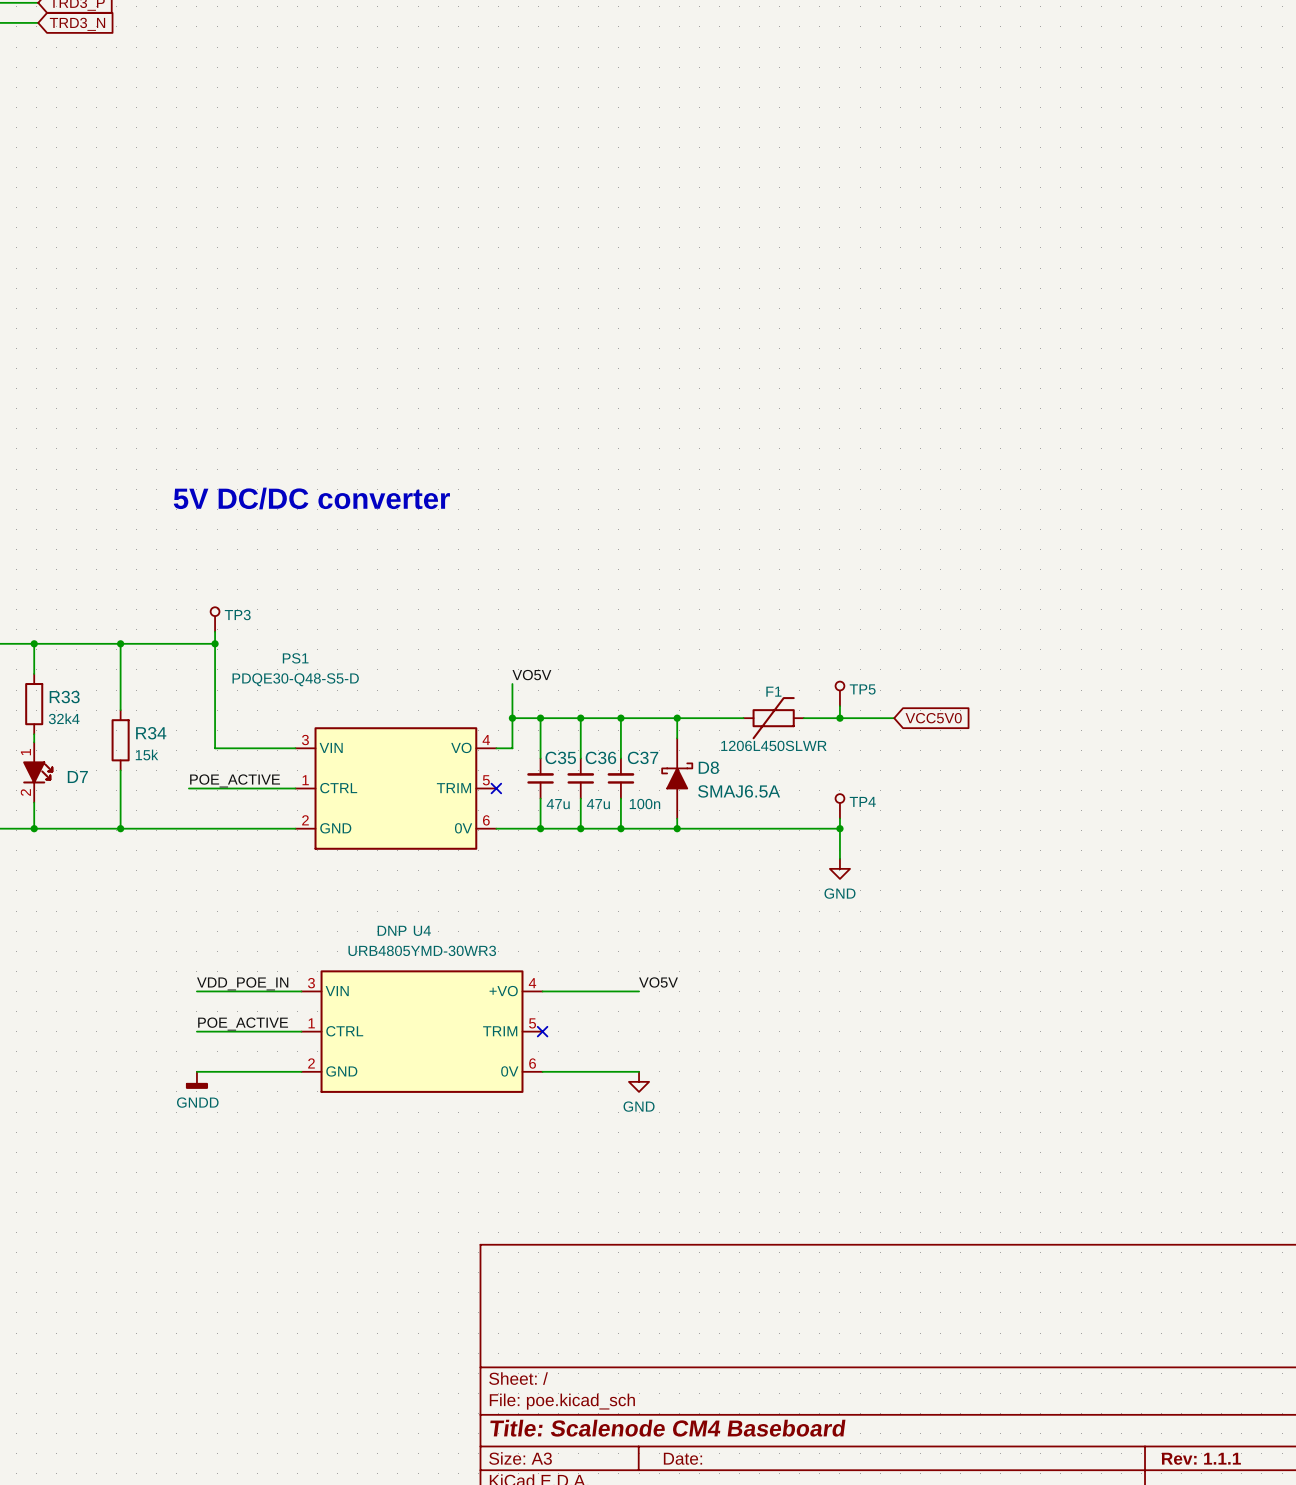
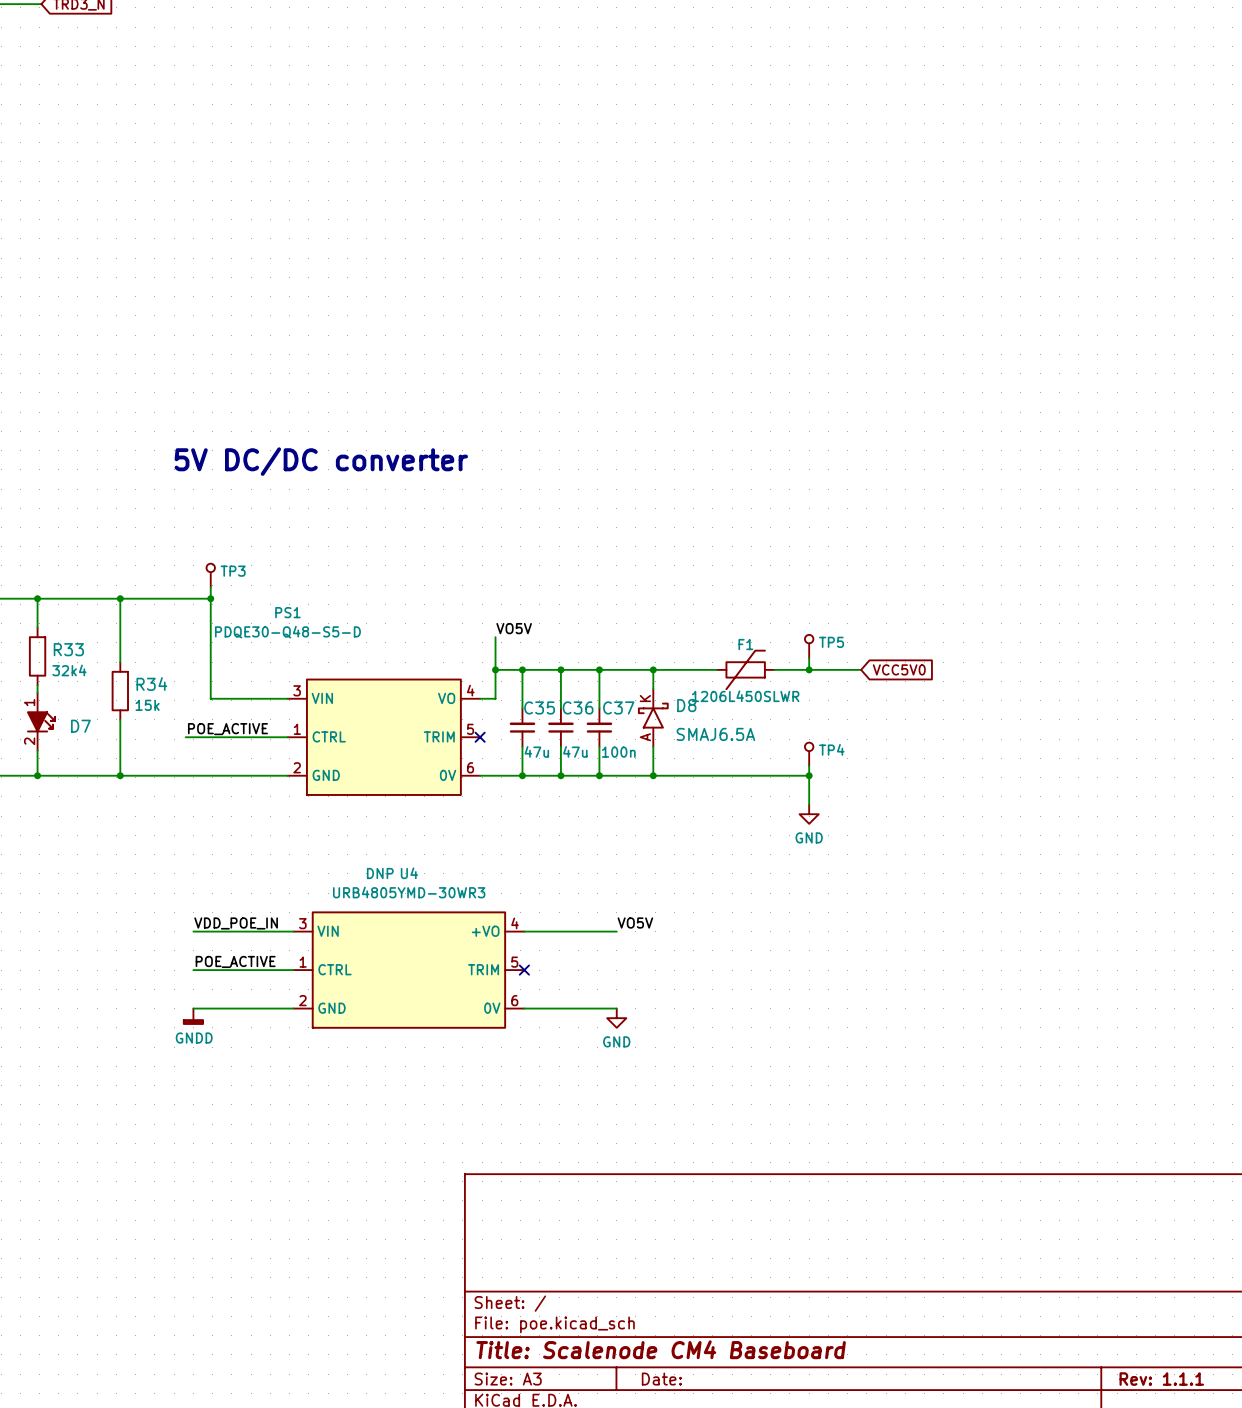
D8 symbol: [662, 738, 693, 819] -> [637, 689, 669, 747]

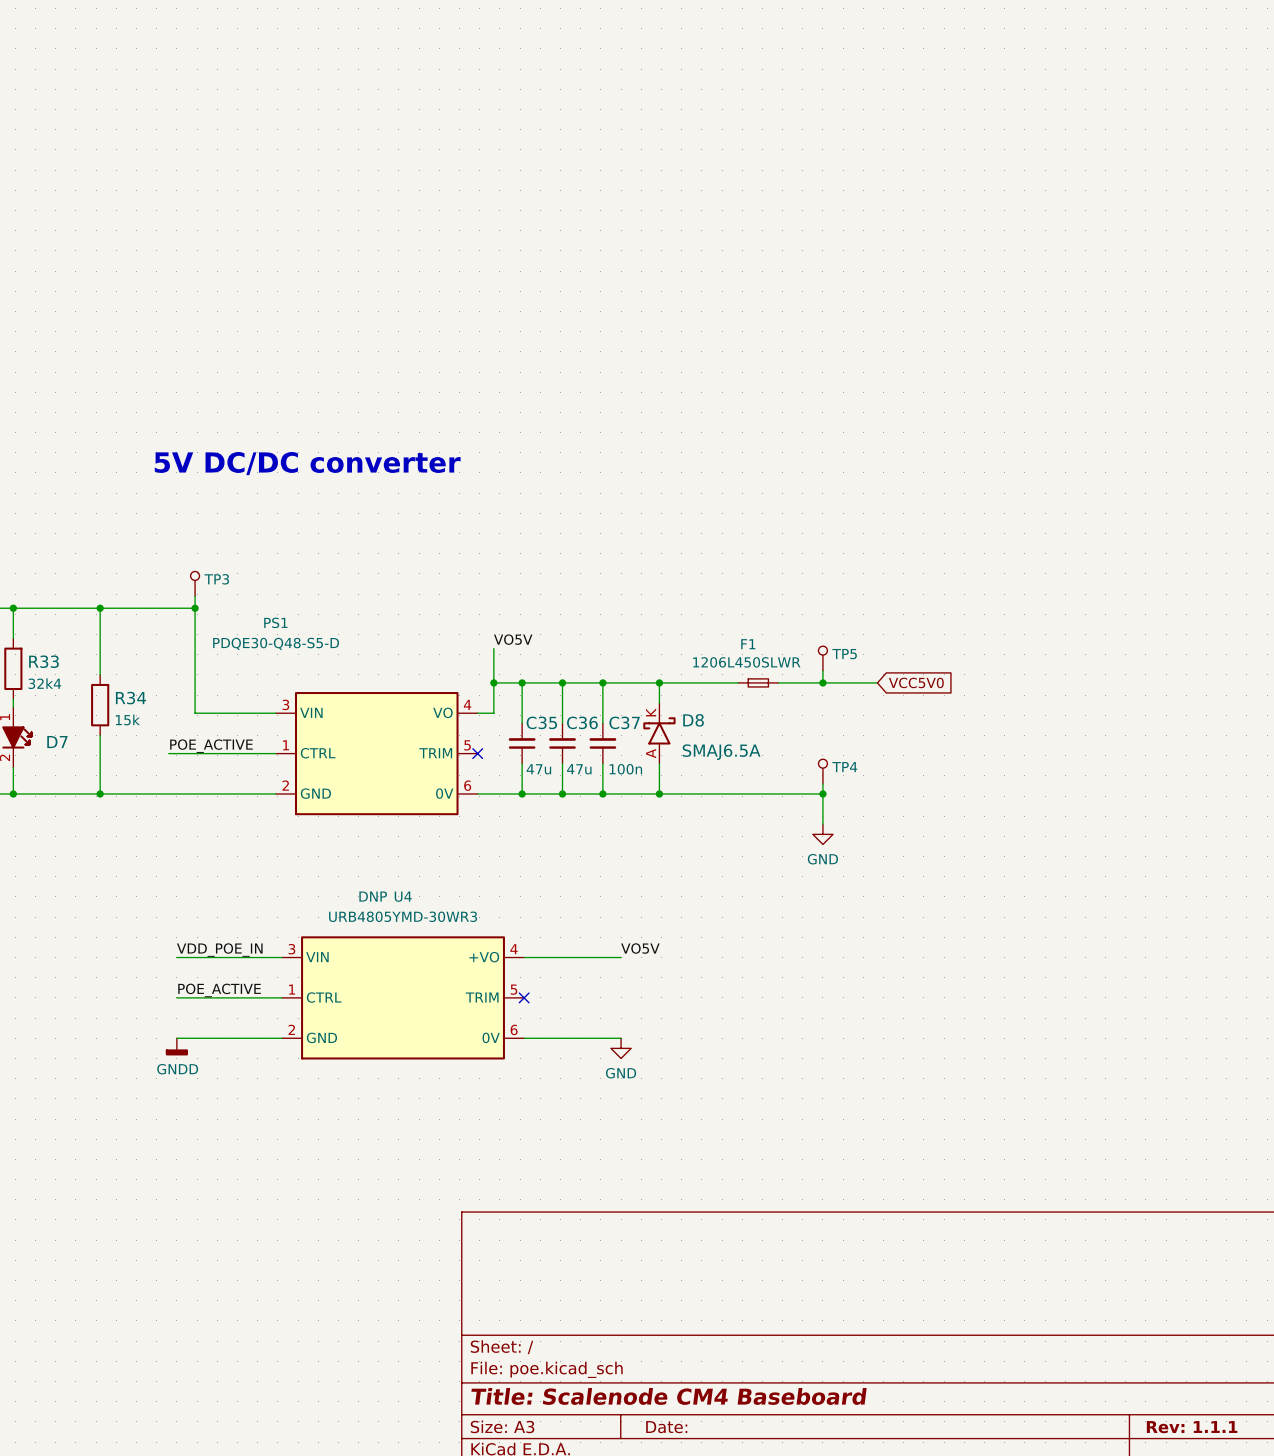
F1 symbol: [716, 649, 775, 691] -> [738, 678, 779, 687]
F1 value position: 1206L450SLWR (745, 696) -> 1206L450SLWR (746, 662)

